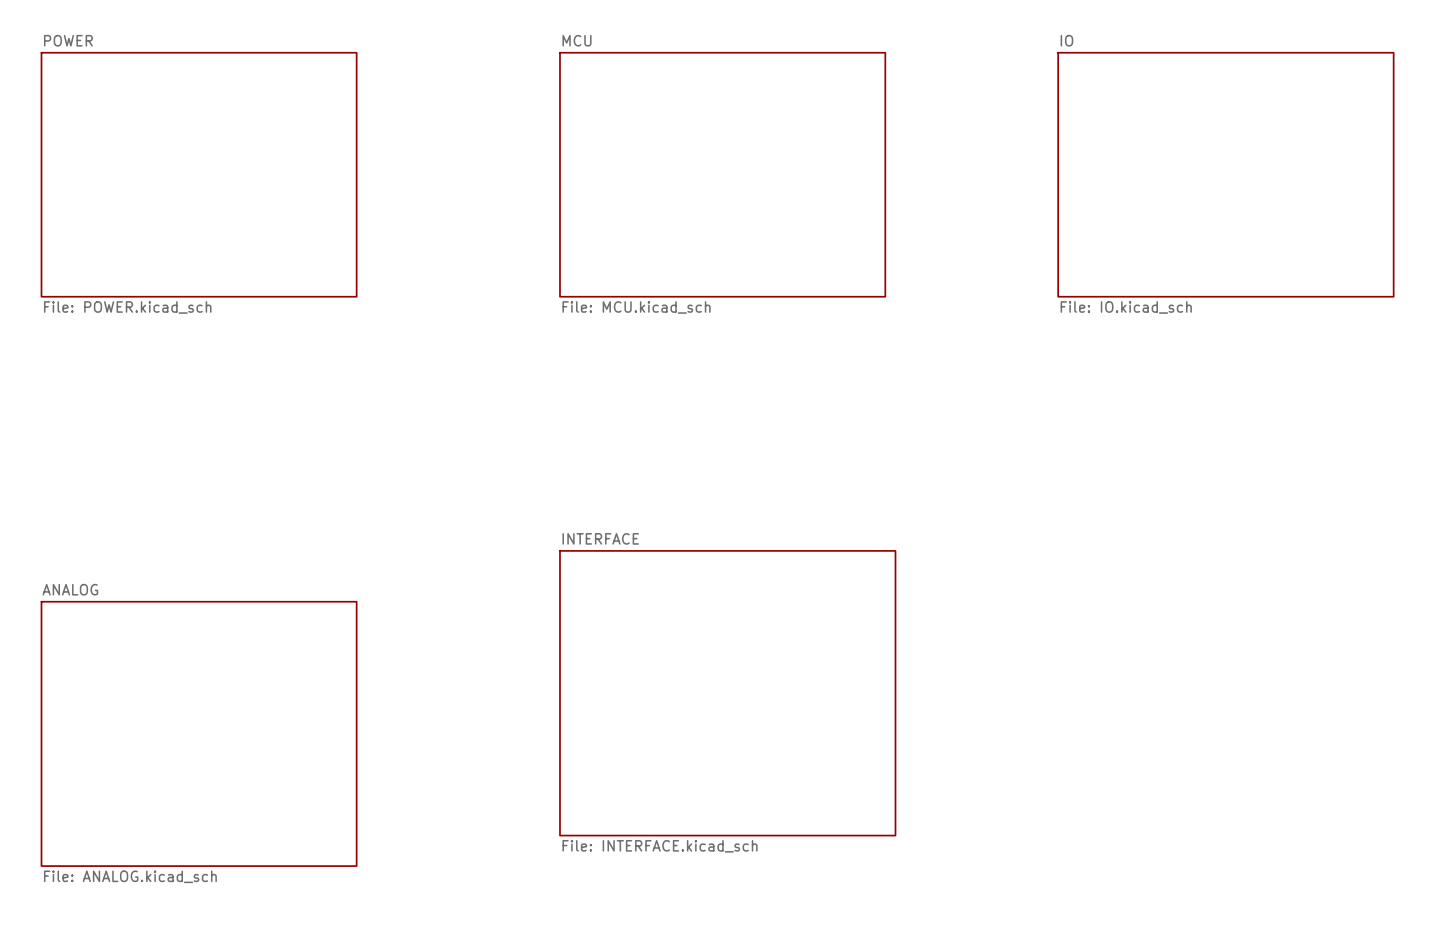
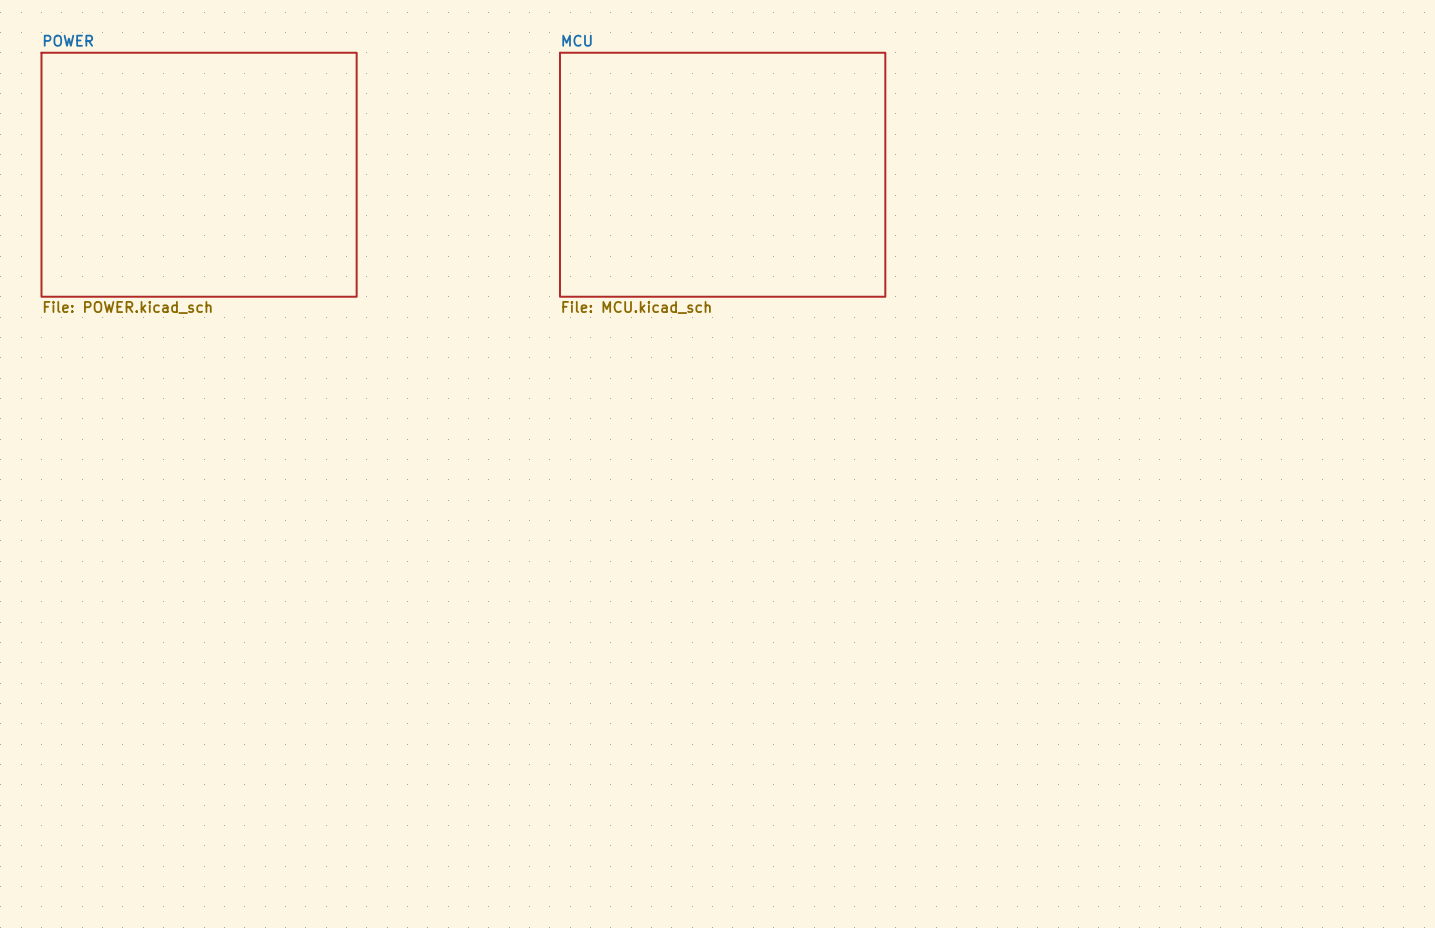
sheet IO: File: IO.kicad_sch (1225, 174) -> none
sheet INTERFACE: File: INTERFACE.kicad_sch (727, 693) -> none
sheet ANALOG: File: ANALOG.kicad_sch (199, 733) -> none

